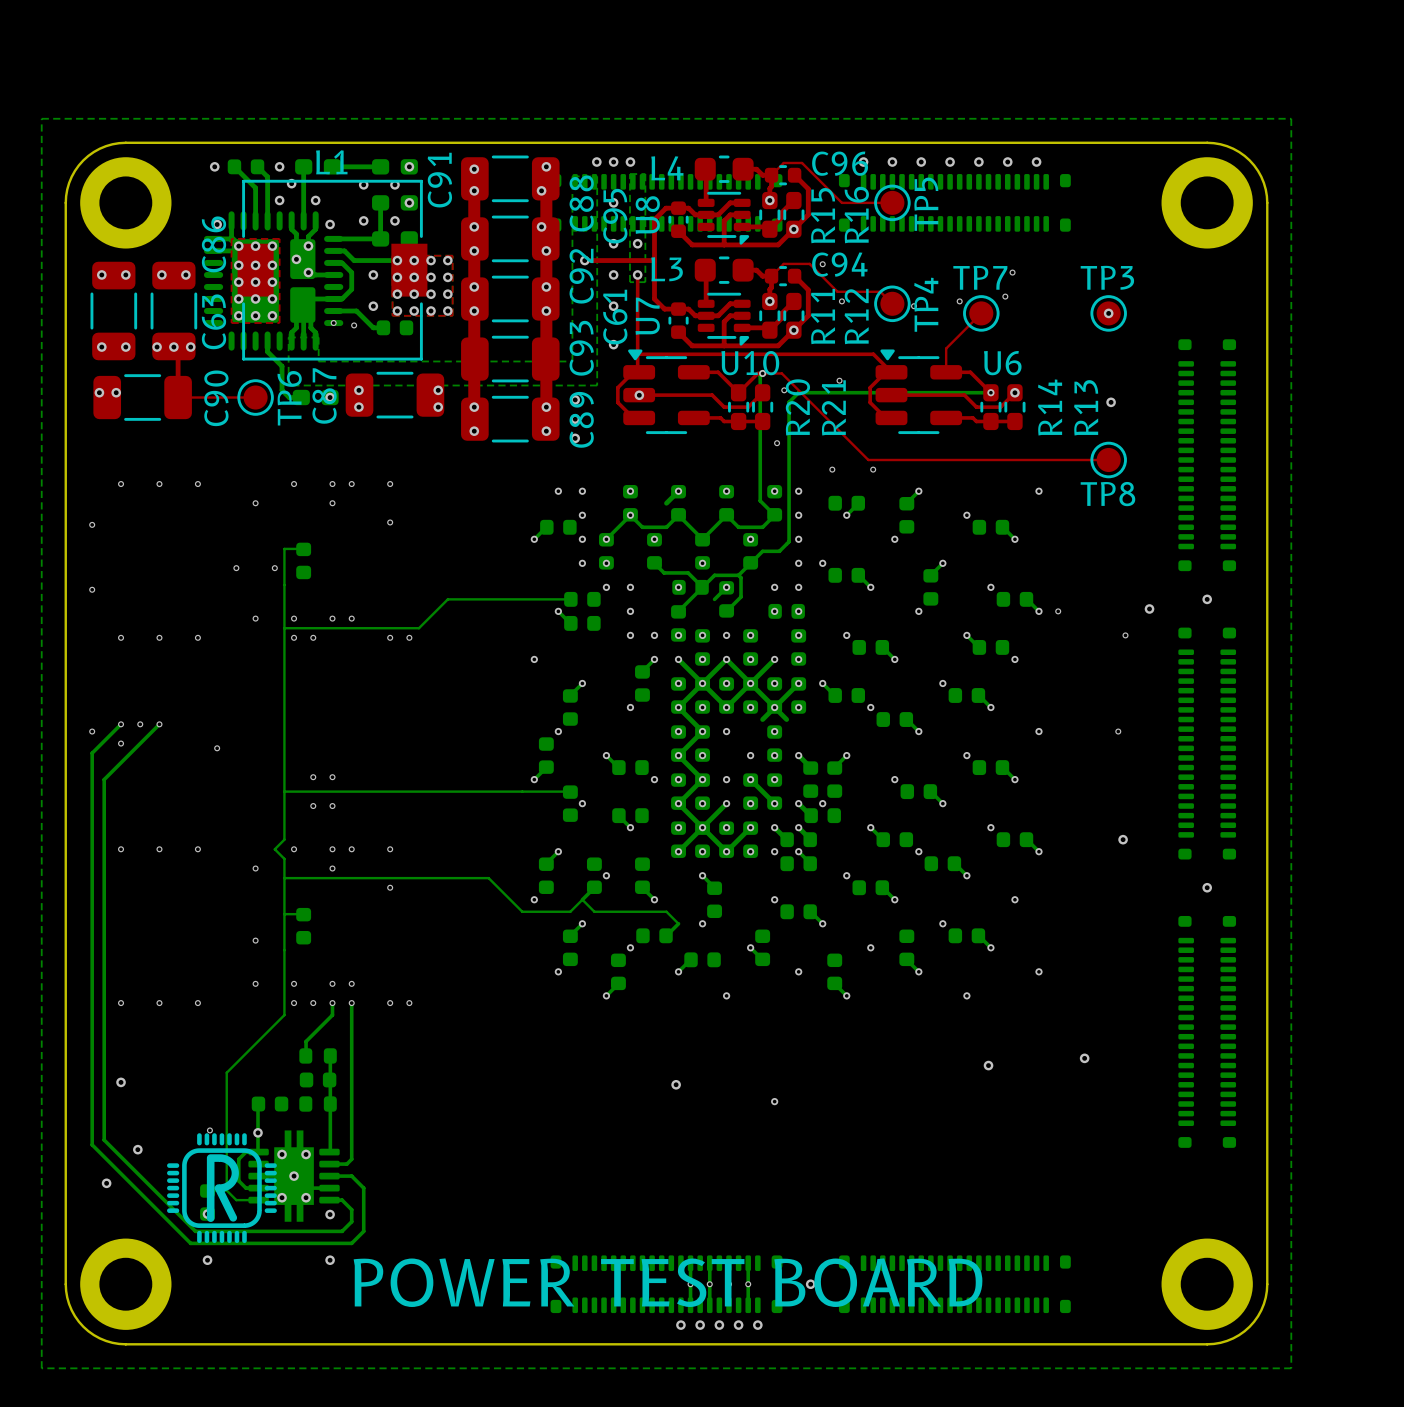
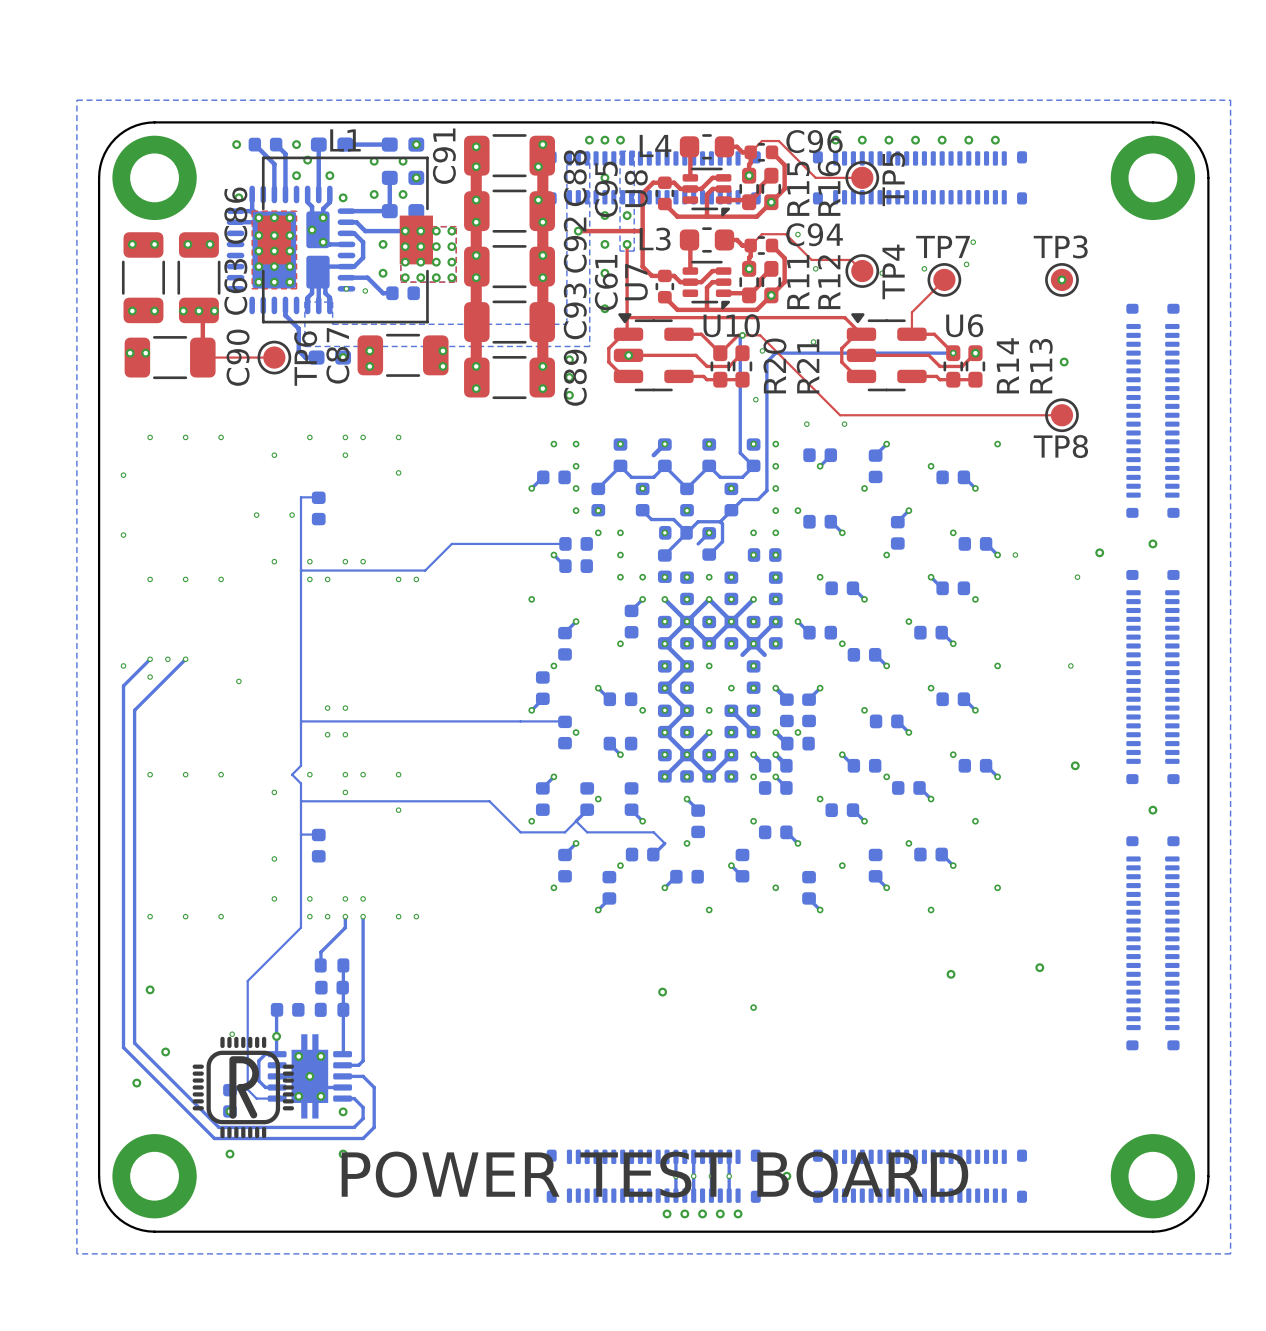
via: (630, 515) -> none
via: (606, 539) -> none

